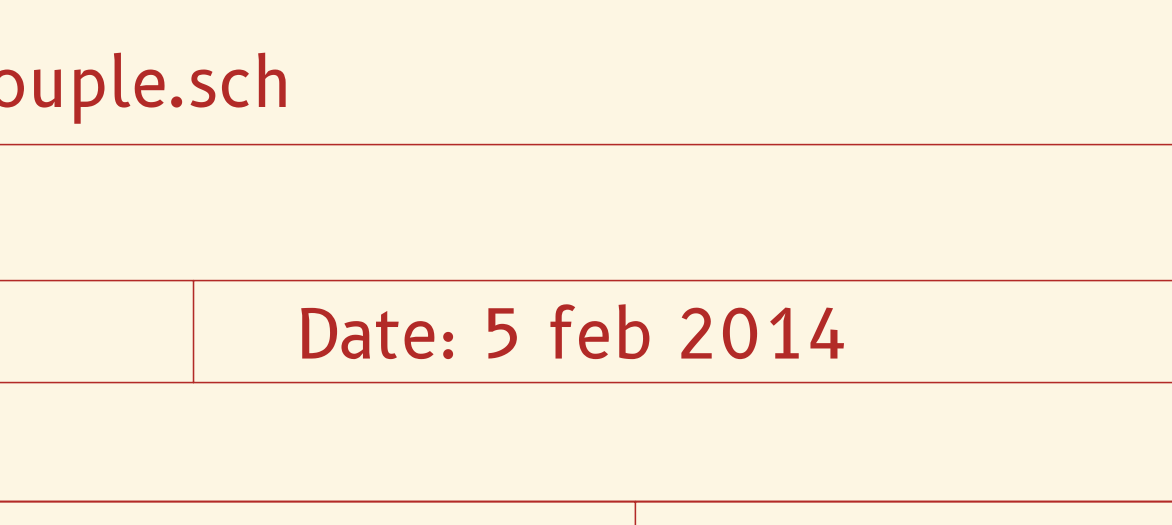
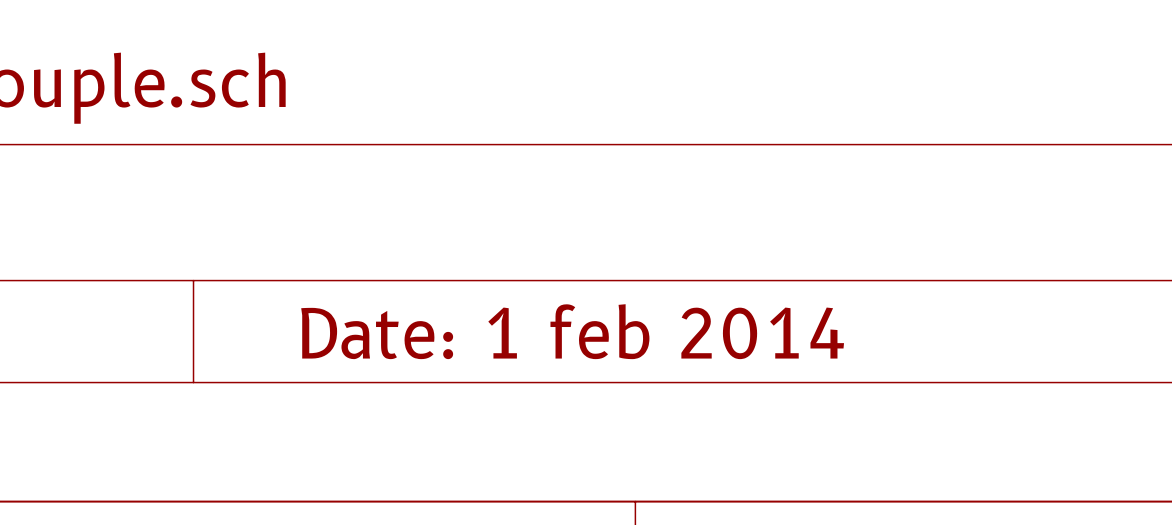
title block: Date: 5 feb 2014 (572, 331) -> Date: 1 feb 2014 (572, 331)

